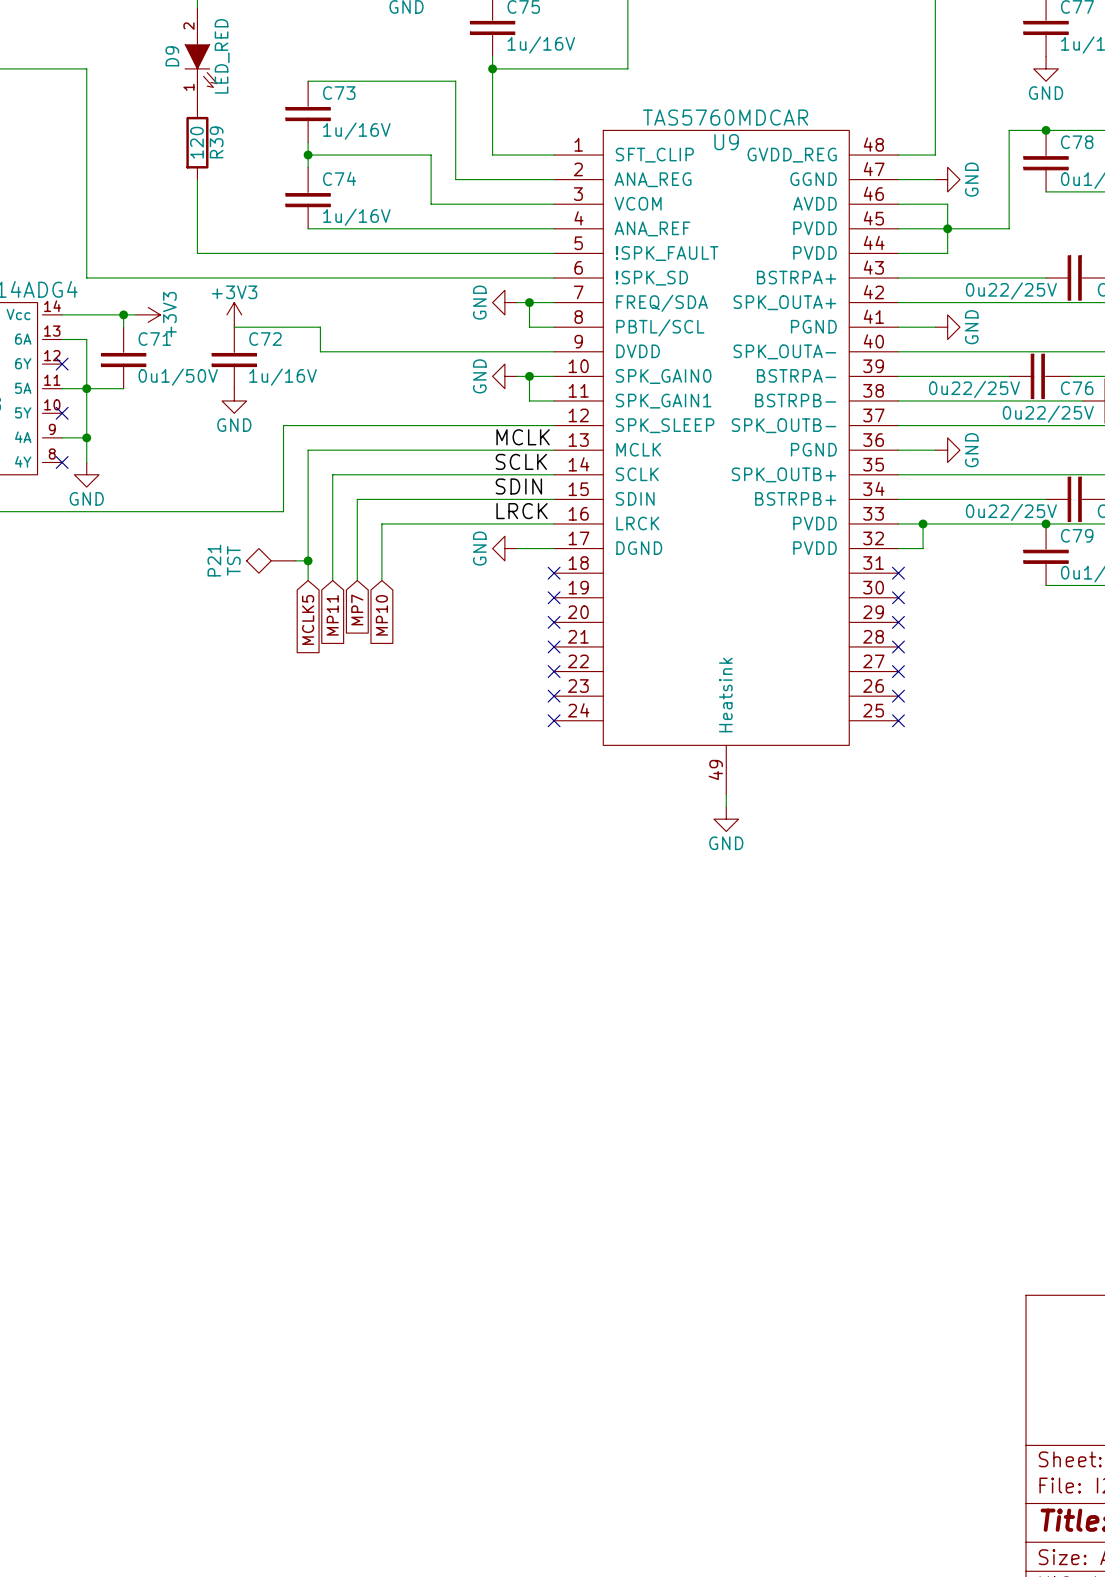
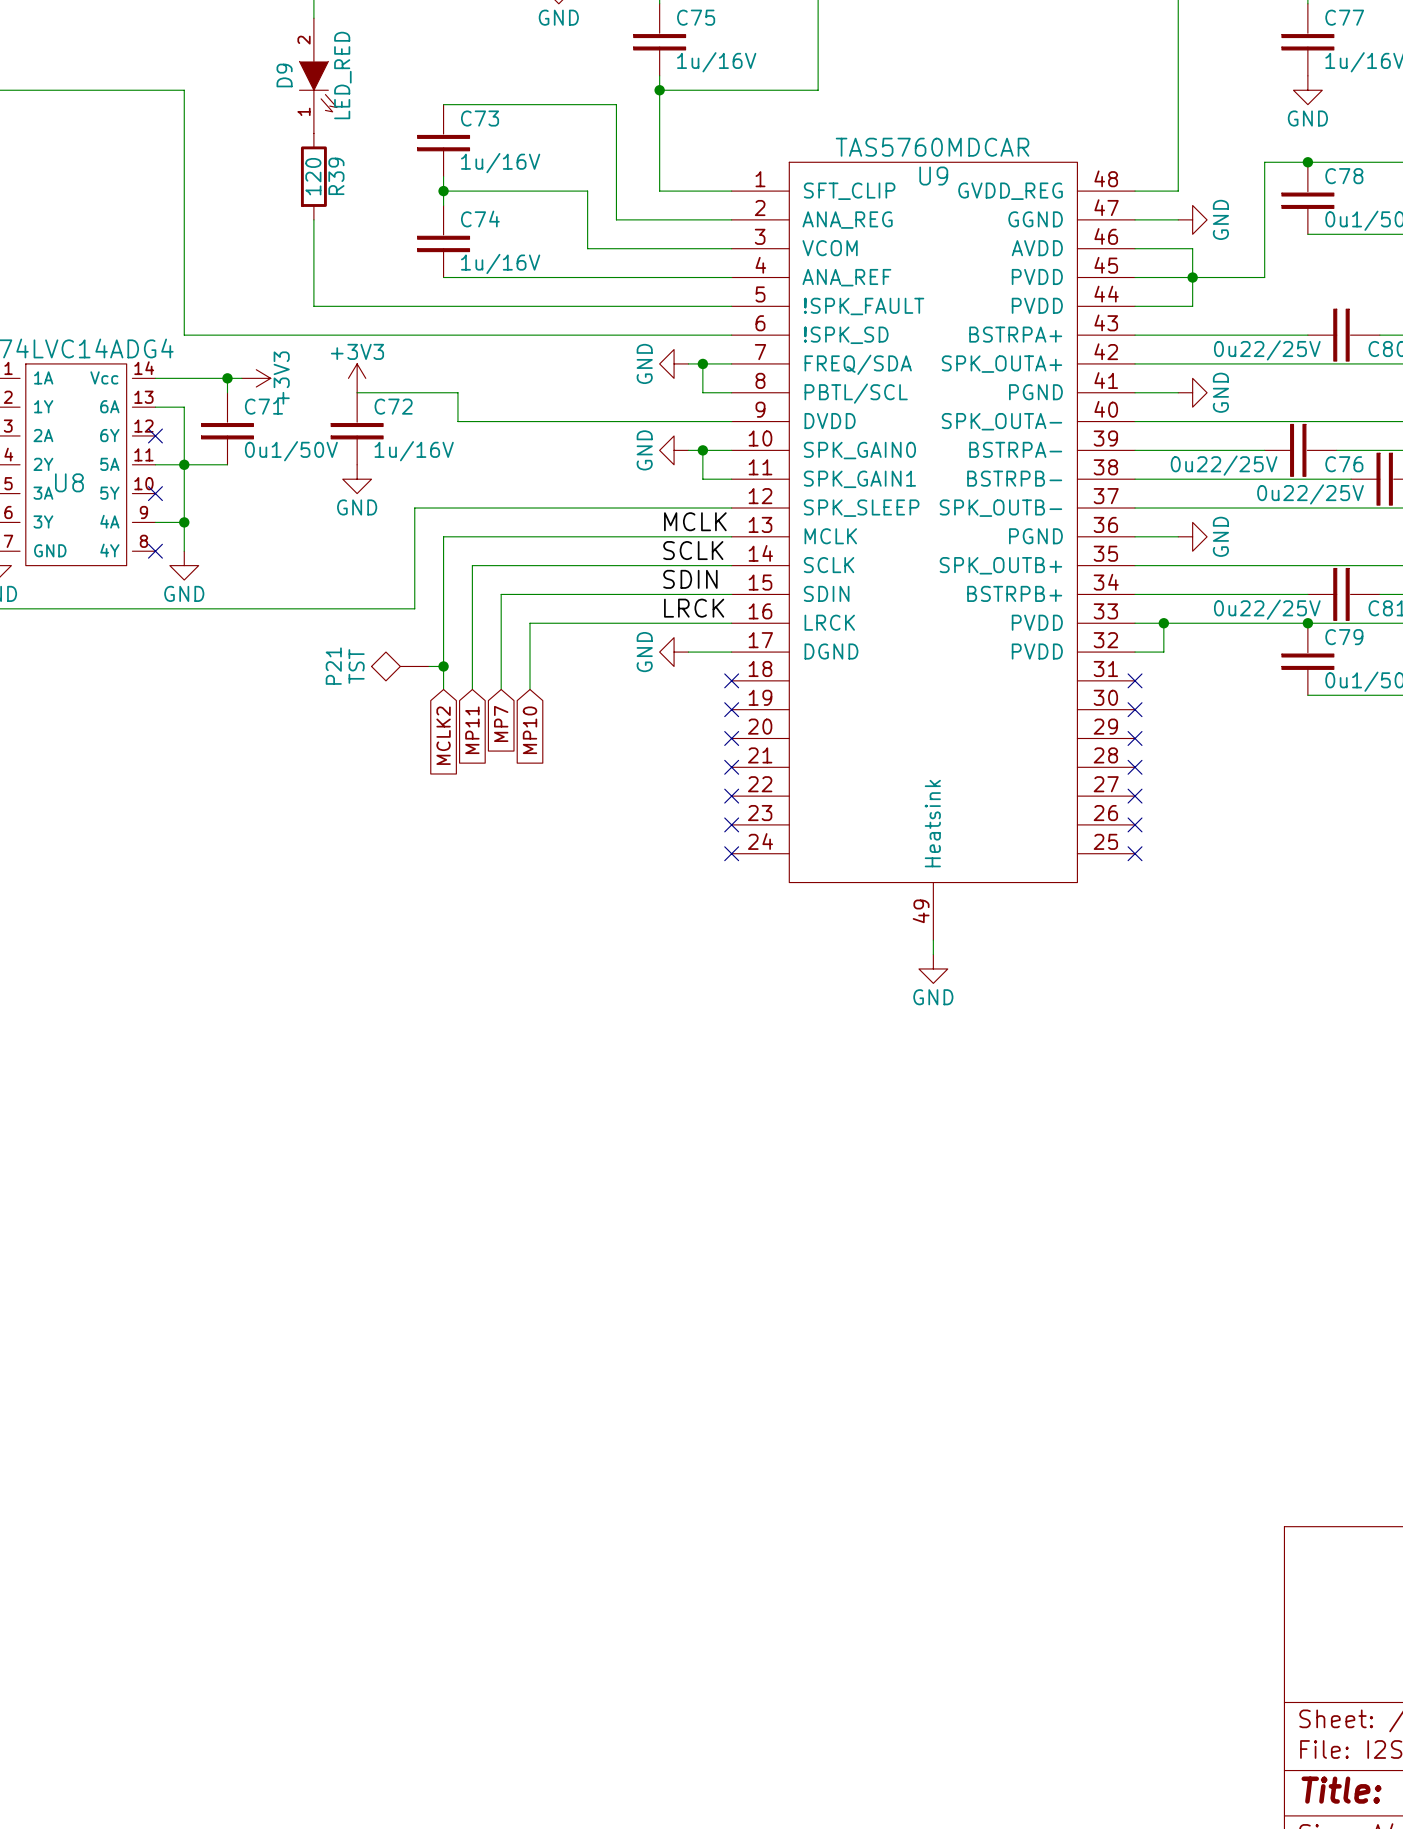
global label: MCLK5 (308, 619) -> MCLK2 (443, 735)

